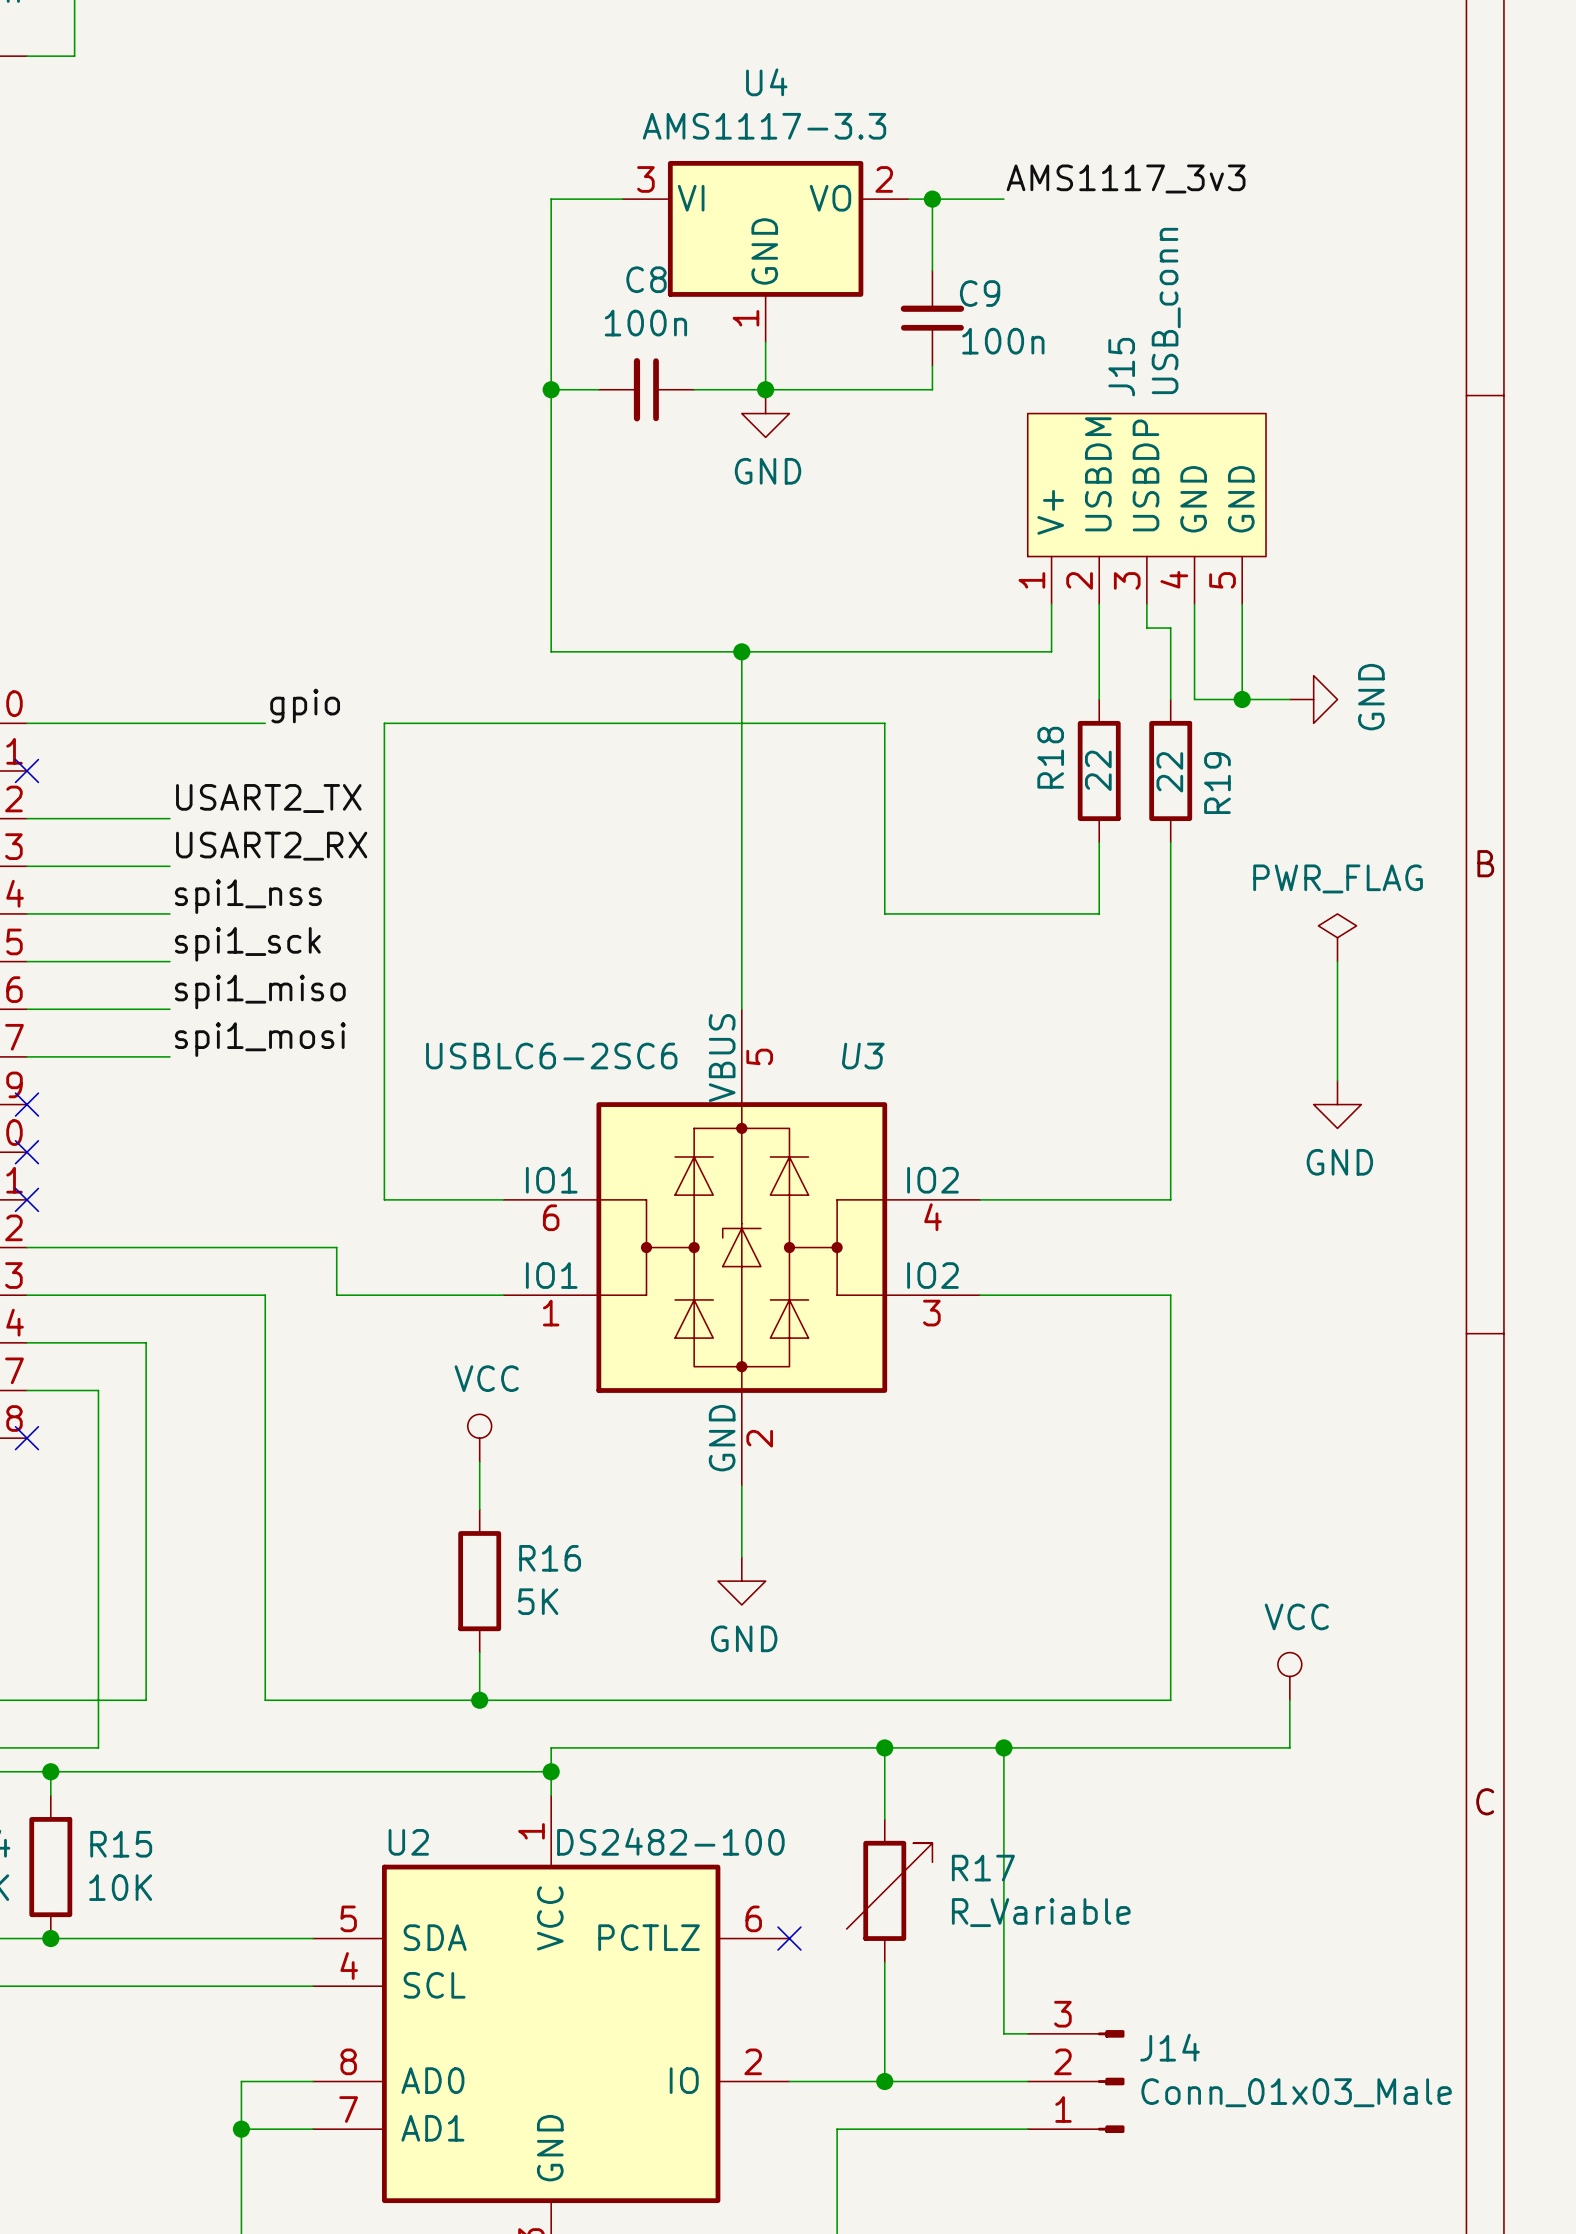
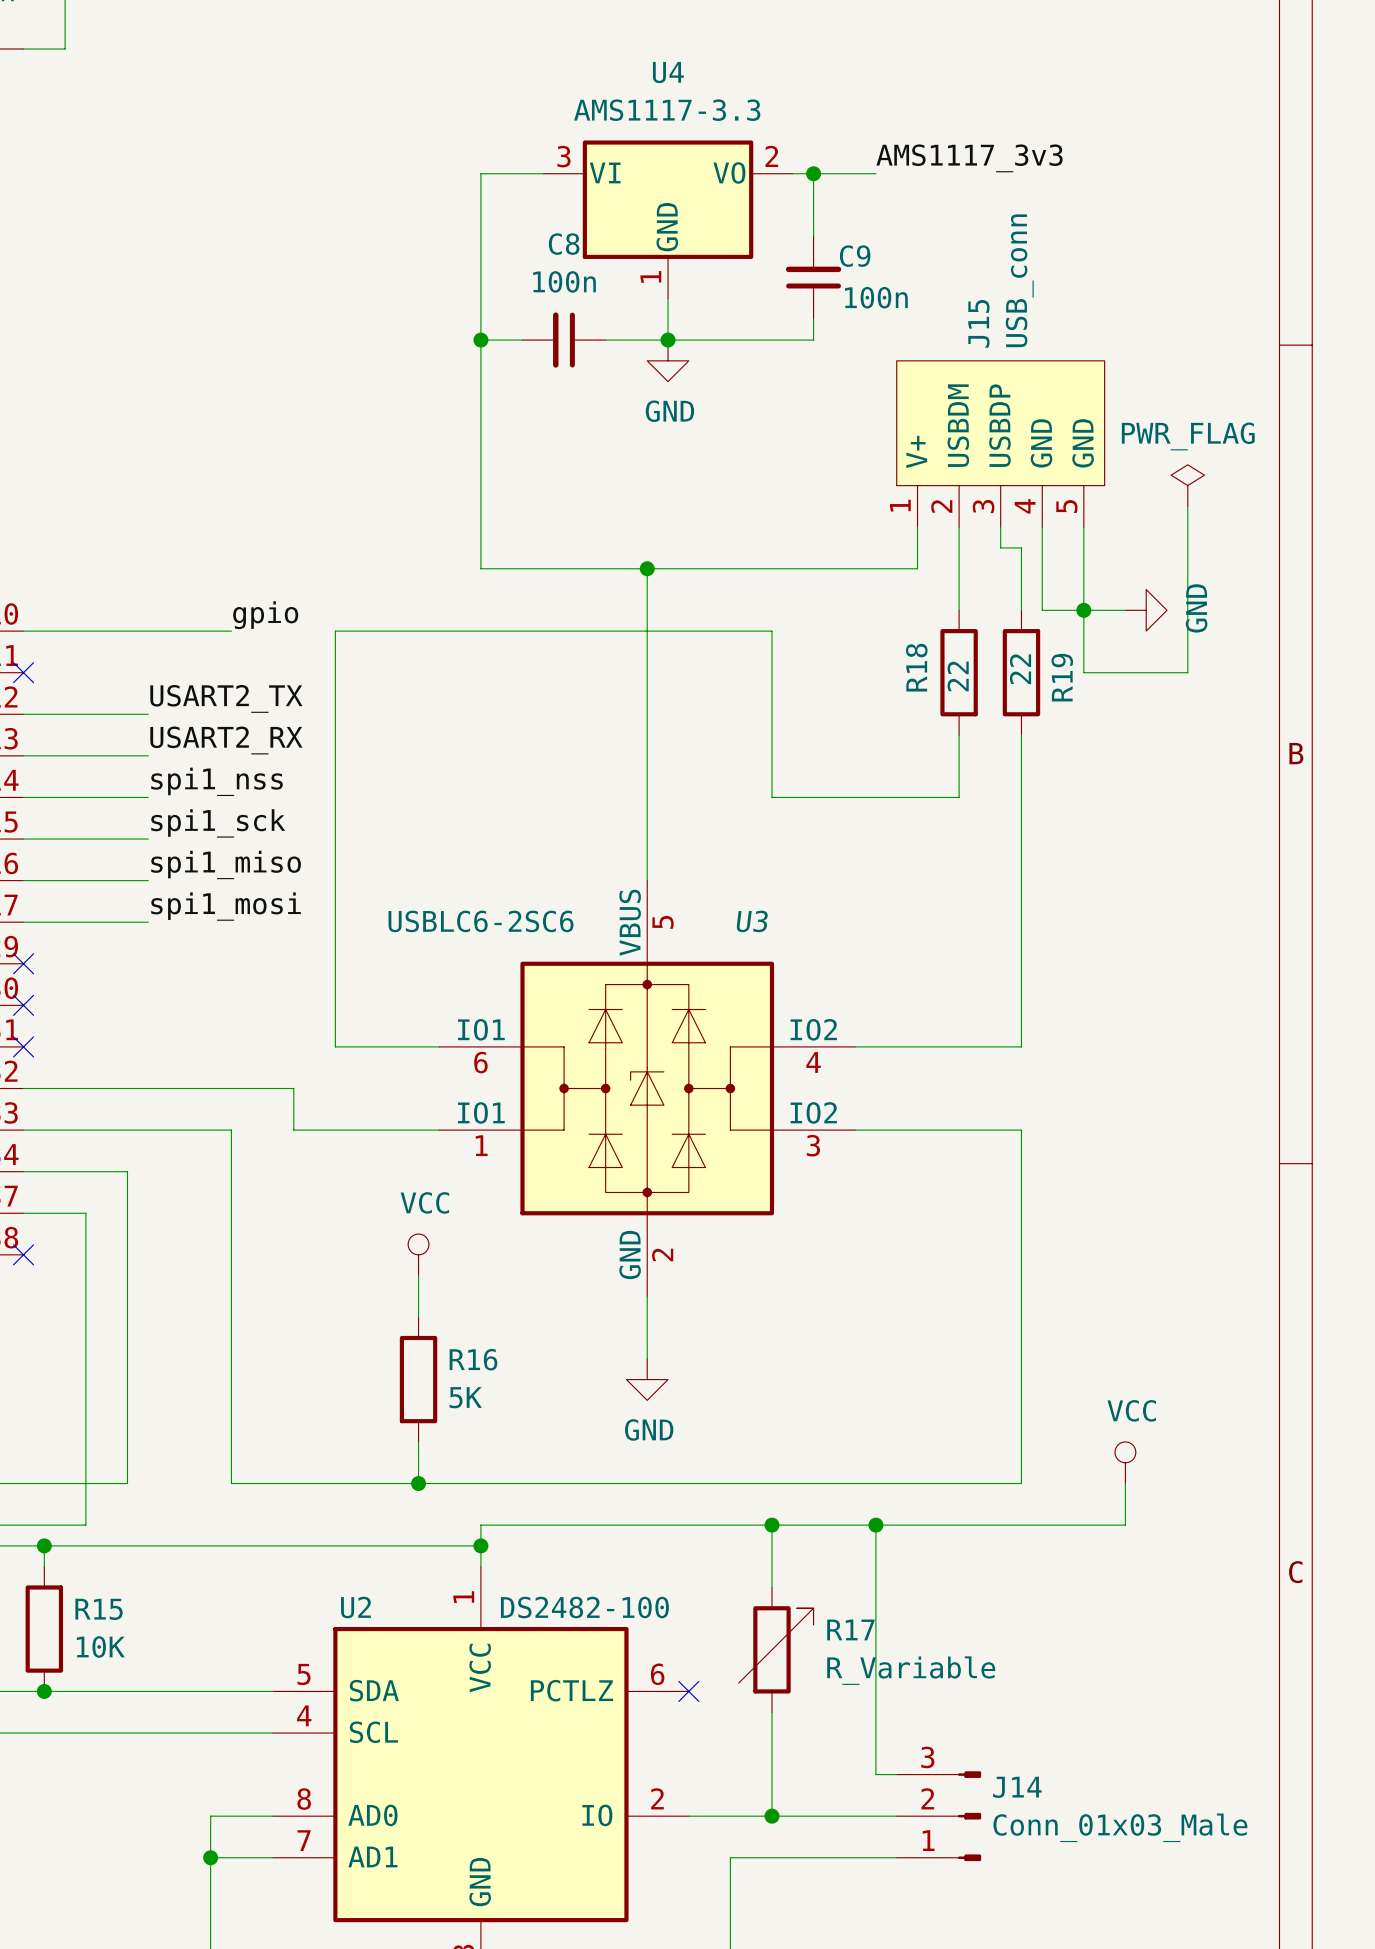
wire: none -> (1187, 506) (1187, 672) (1083, 672) (1083, 610)
power symbol position: PWR_FLAG (1337, 937) -> PWR_FLAG (1187, 485)
wire: (1337, 961) (1337, 1080) -> none
power symbol: GND (1337, 1104) -> none

